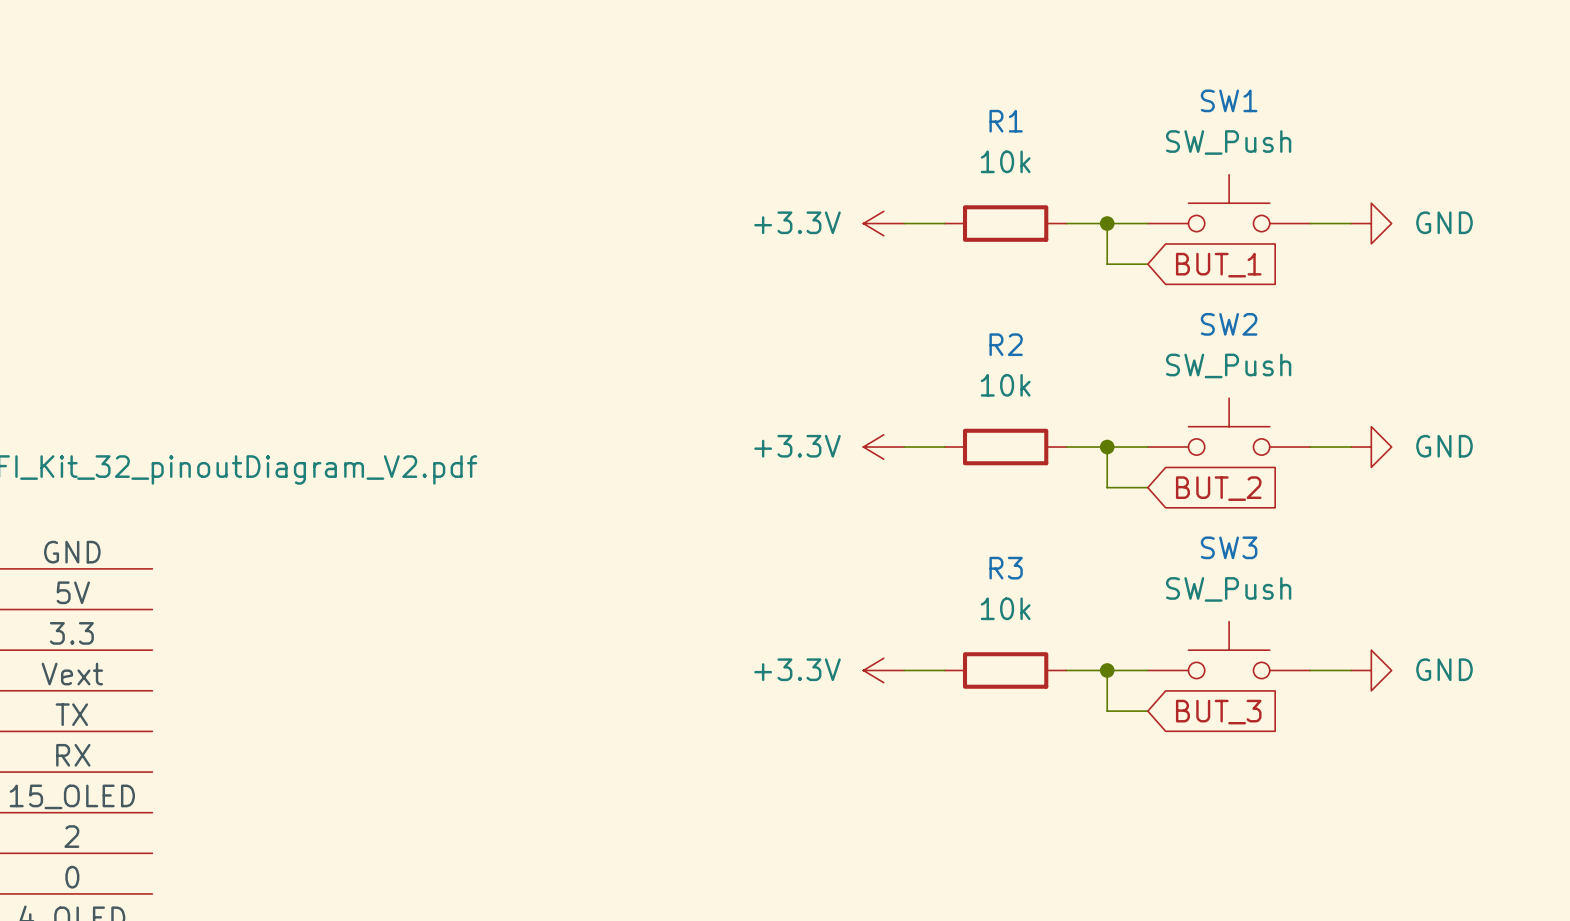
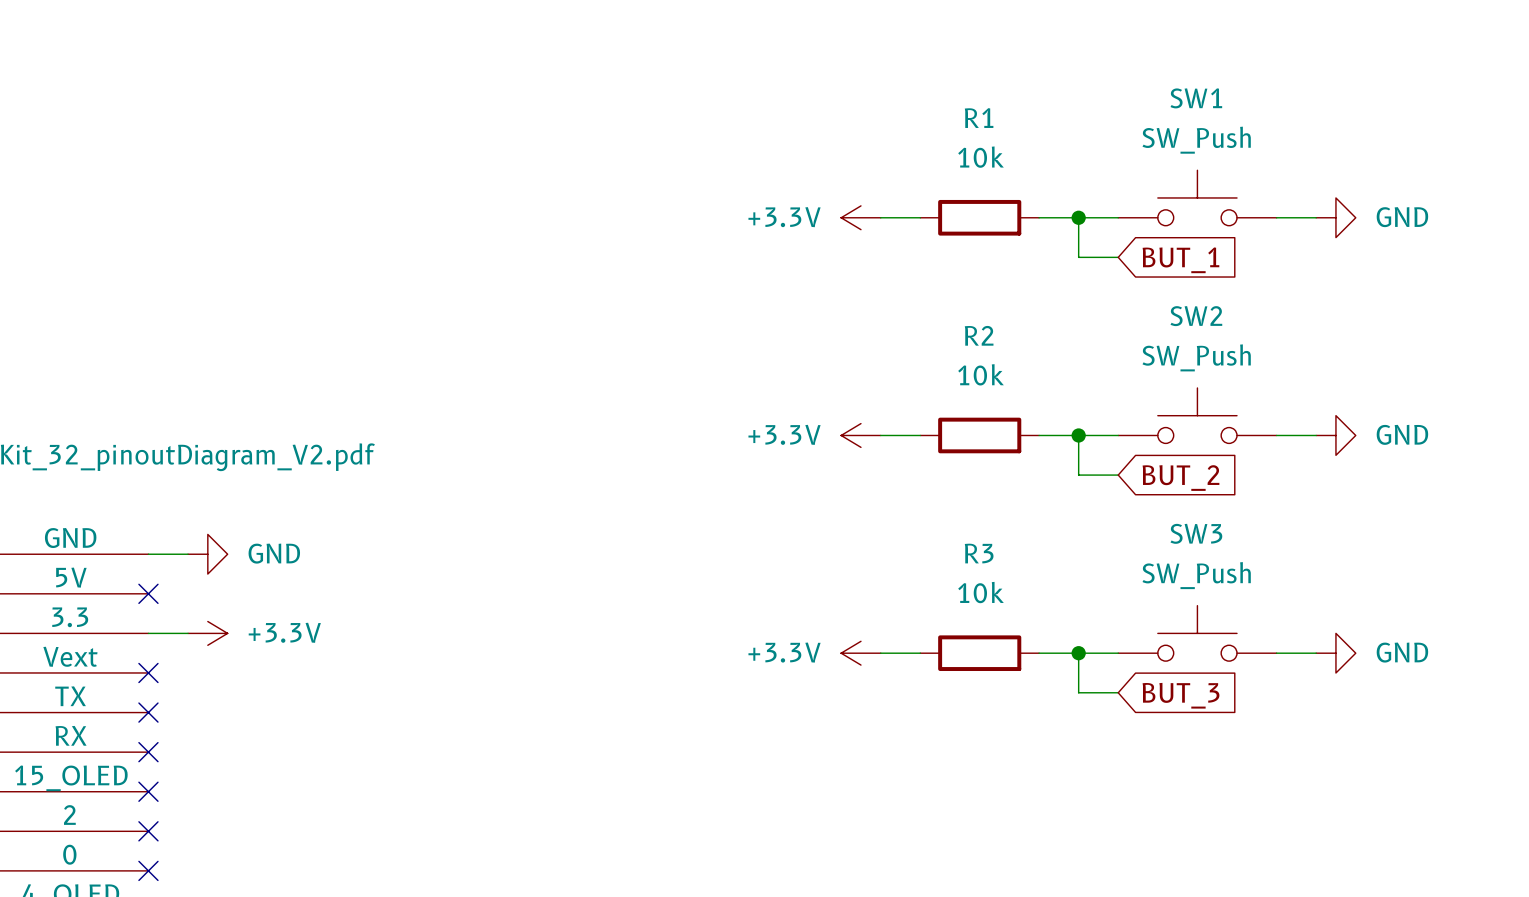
wire: none -> (148, 554) (188, 554)
power symbol: none -> GND (207, 554)
no-connect mark: none -> (148, 593)
wire: none -> (148, 633) (188, 633)
power symbol: none -> +3.3V (207, 633)
no-connect mark: none -> (148, 672)
no-connect mark: none -> (148, 712)
no-connect mark: none -> (148, 752)
no-connect mark: none -> (148, 791)
no-connect mark: none -> (148, 831)
no-connect mark: none -> (148, 870)

